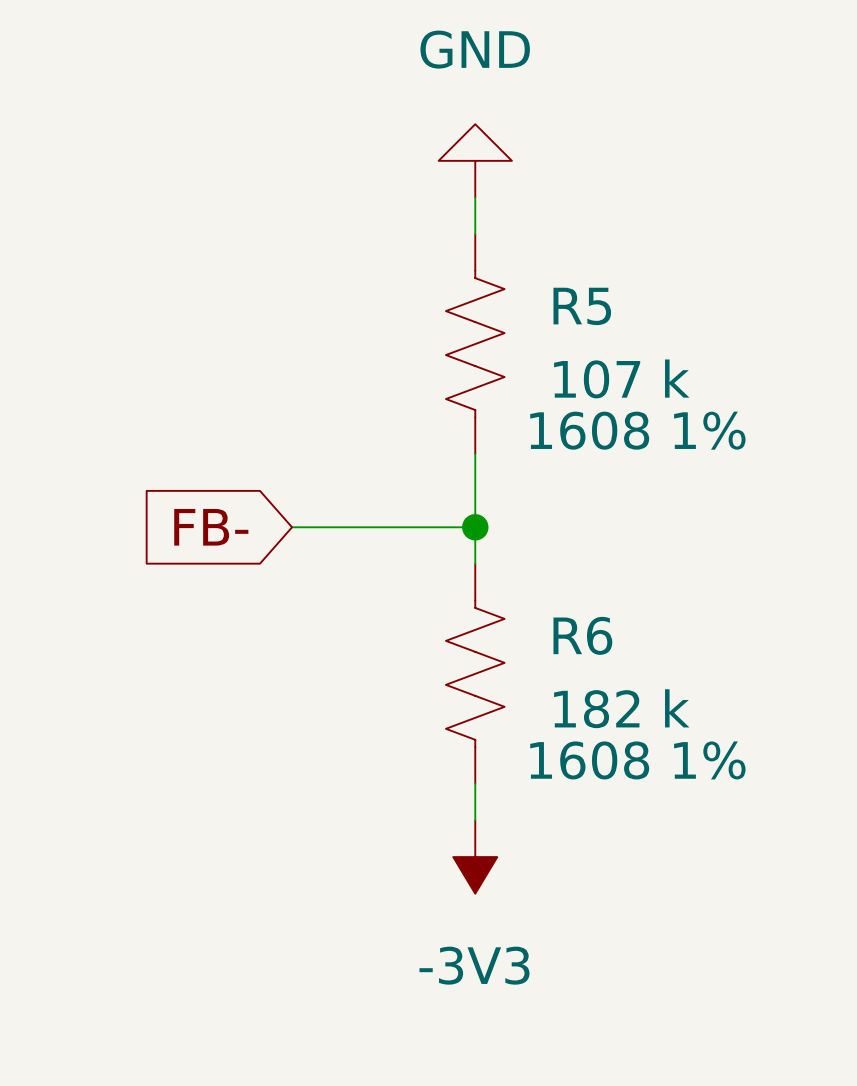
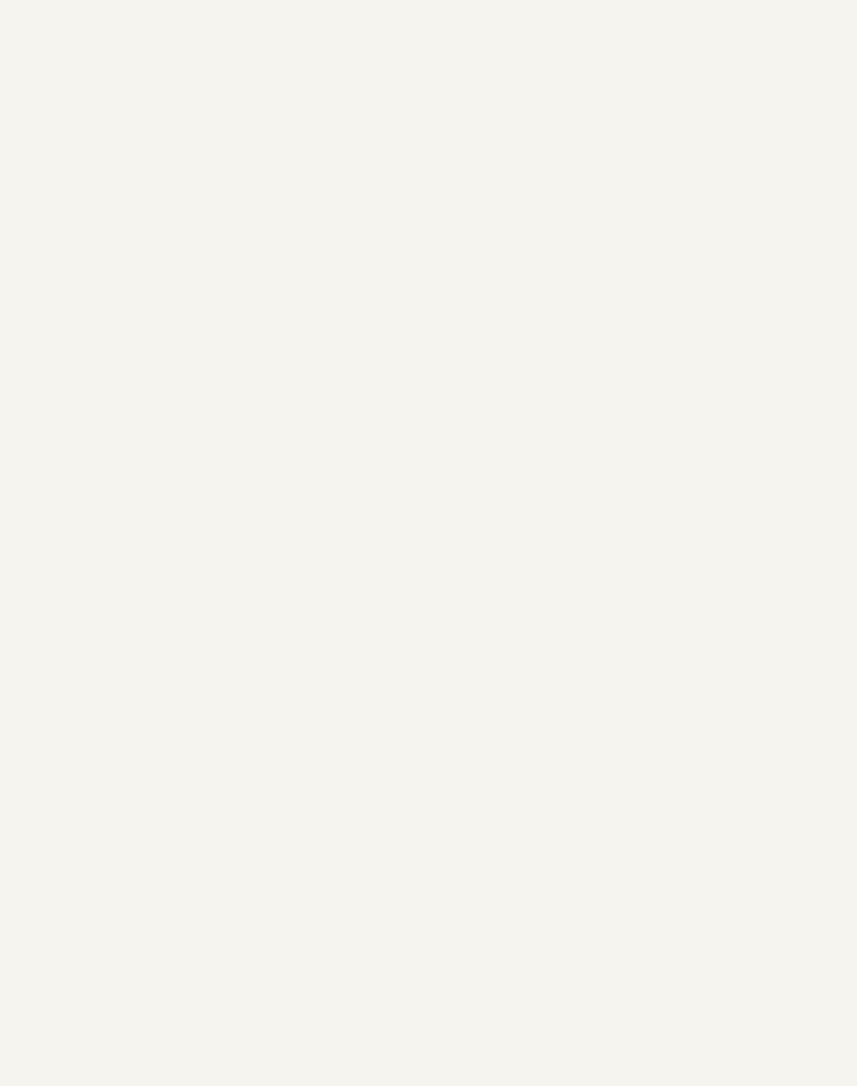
power symbol: GND (475, 160) -> none
wire: (475, 197) (475, 234) -> none
R5: 107 k (475, 344) -> none
wire: (475, 453) (475, 563) -> none
global label: FB- (211, 527) -> none
wire: (292, 527) (475, 527) -> none
junction: (475, 527) -> none
R6: 182 k (475, 673) -> none
wire: (475, 783) (475, 820) -> none
power symbol: -3V3 (475, 857) -> none

